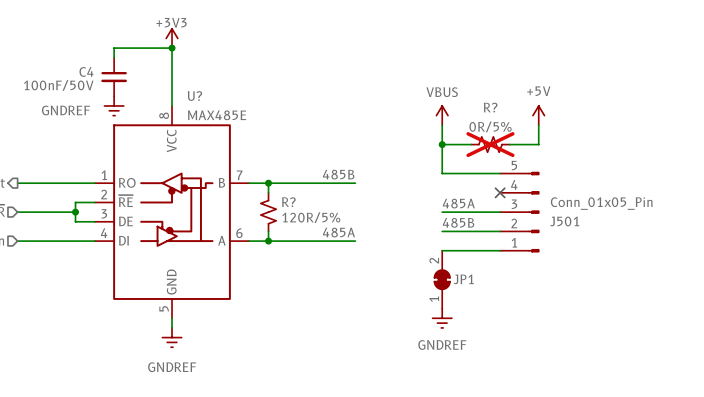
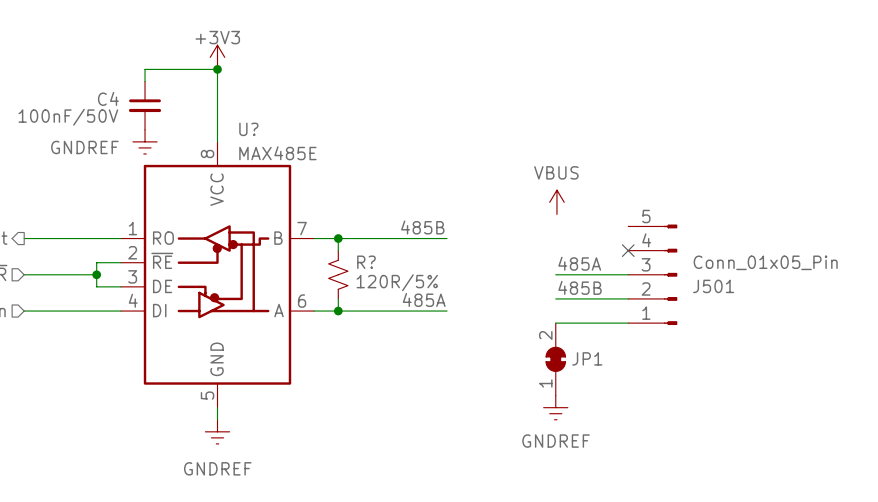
power symbol position: VBUS (442, 115) -> VBUS (556, 202)
power symbol: +5V (538, 115) -> none
wire: (442, 125) (442, 173) (500, 173) -> none
wire: (538, 125) (538, 144) (509, 144) -> none
wire: (442, 144) (471, 144) -> none
junction: (442, 144) -> none
R?: 0R/5% (490, 144) -> none

